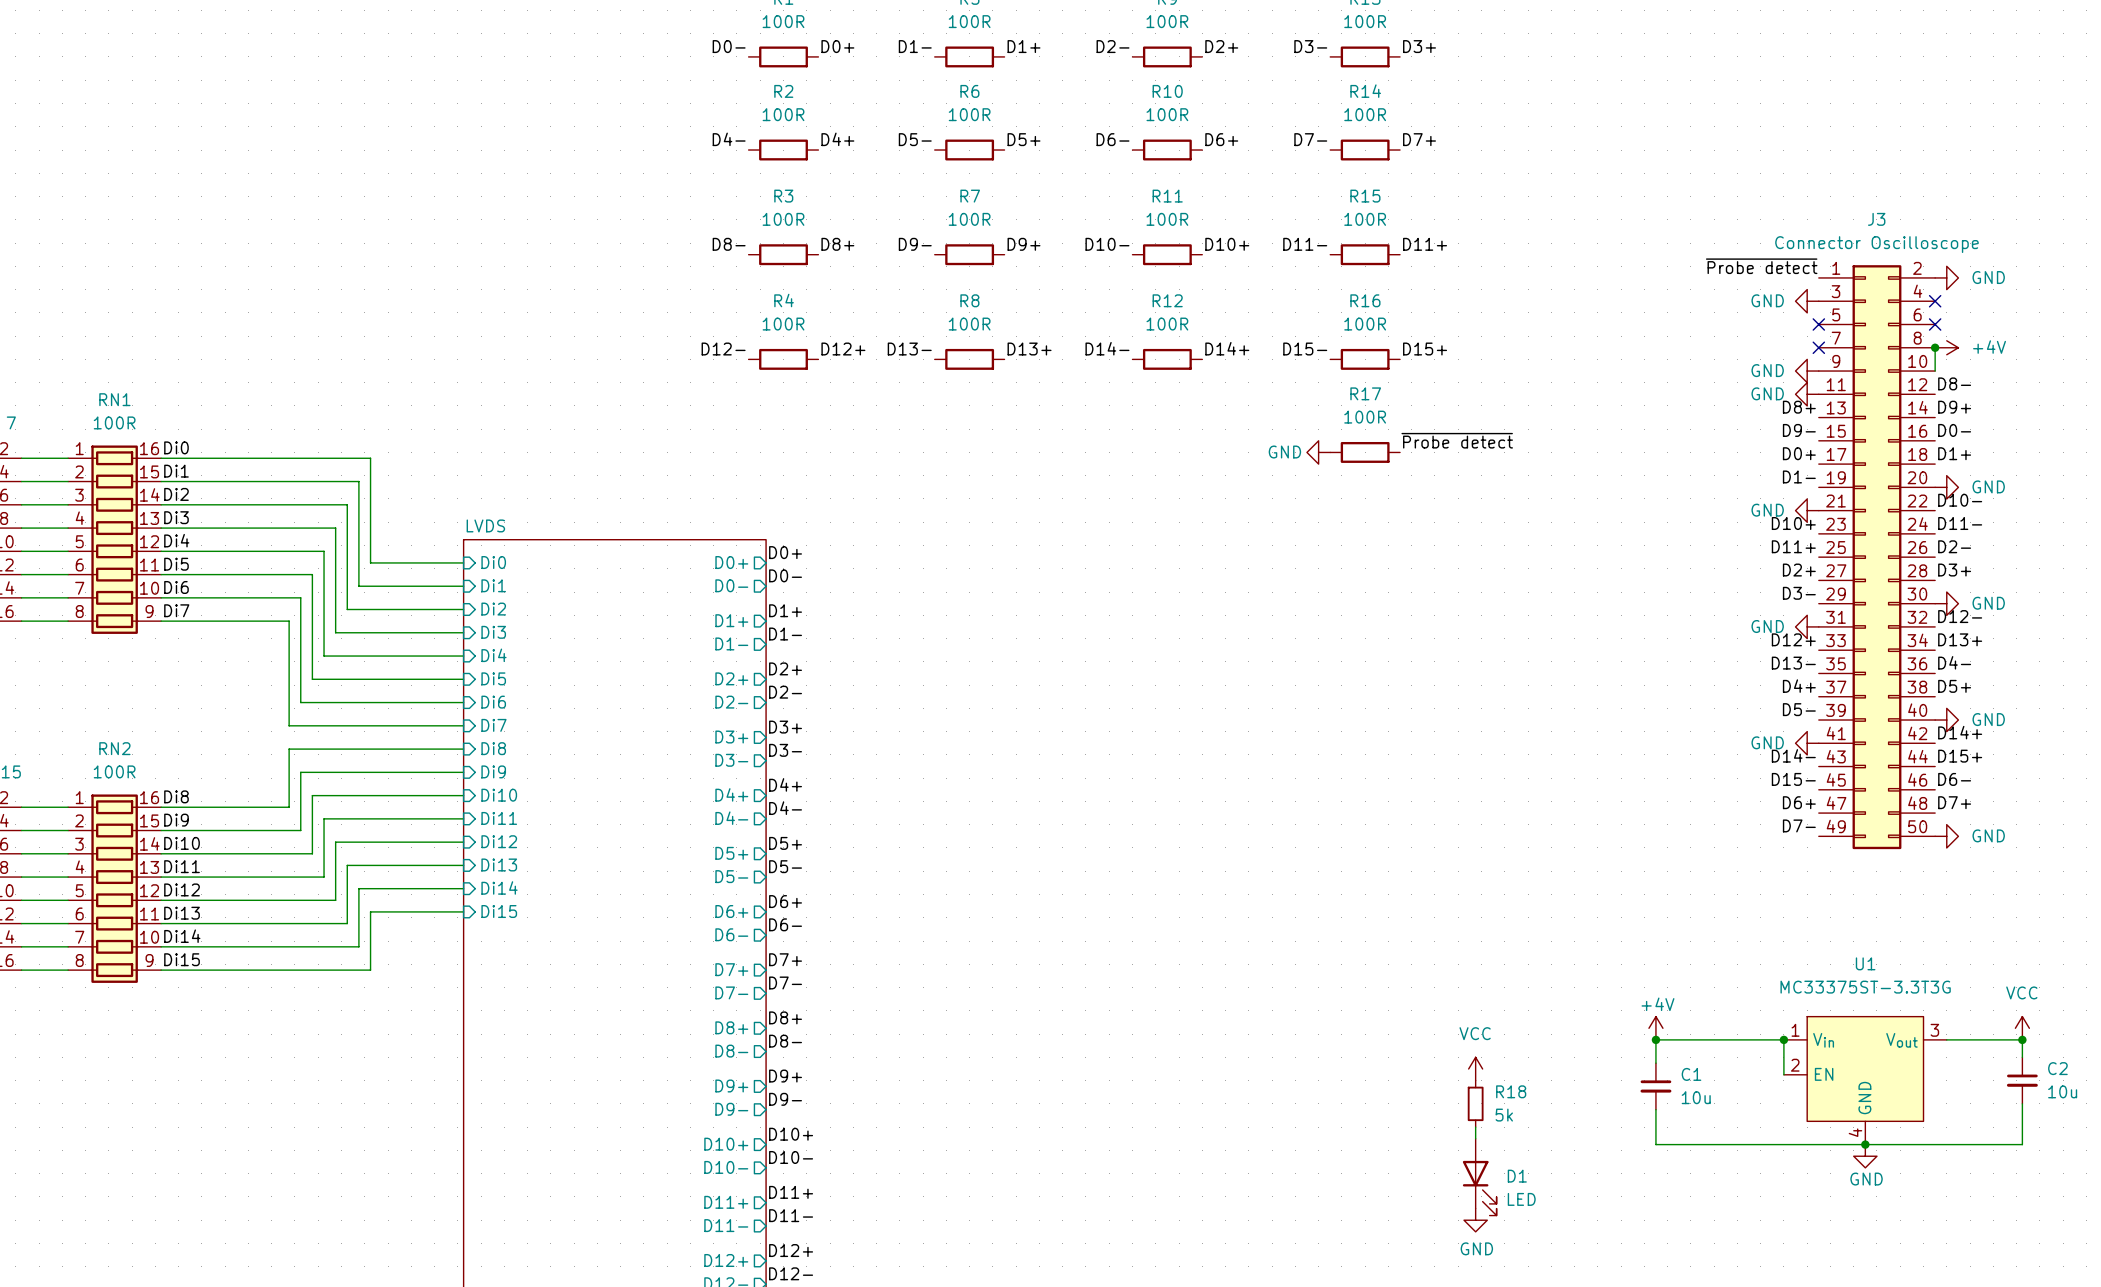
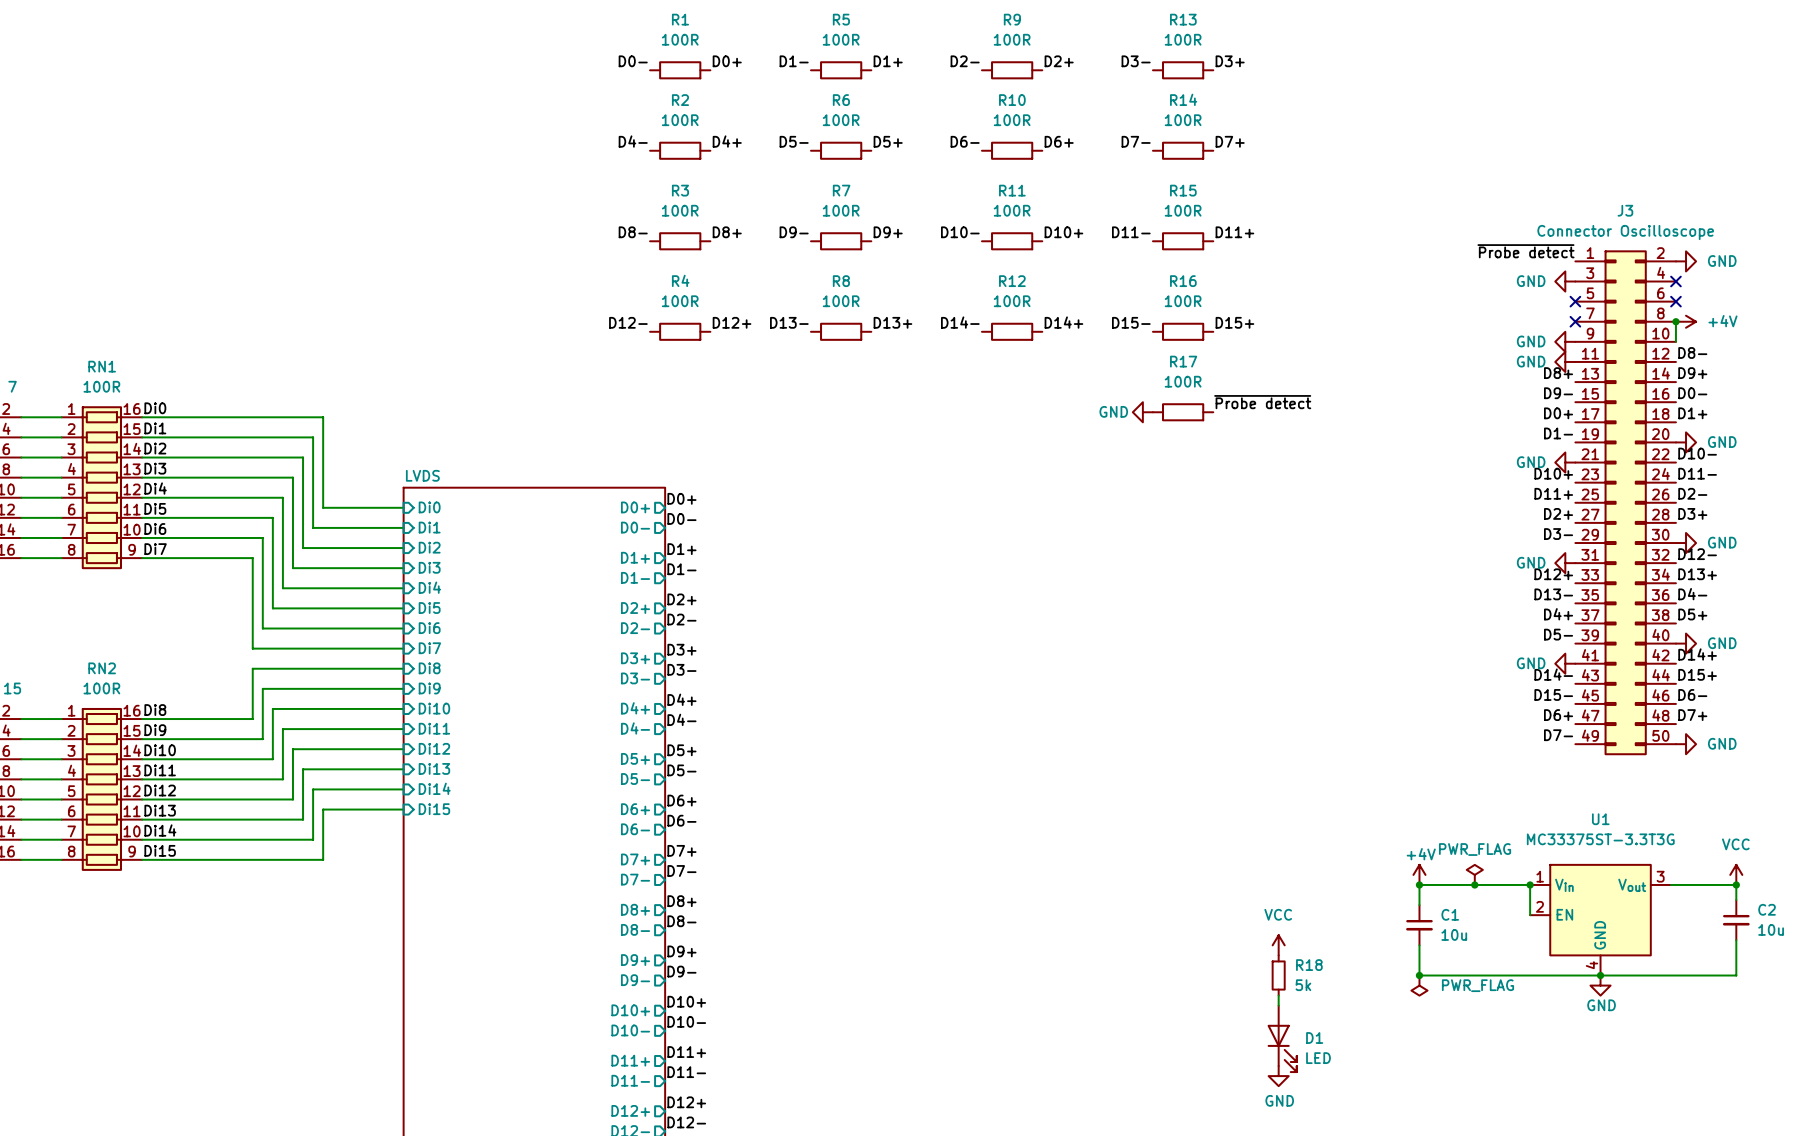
power symbol: none -> PWR_FLAG (1474, 874)
junction: none -> (1419, 884)
junction: none -> (1474, 884)
power symbol position: +4V (1655, 1028) -> +4V (1419, 874)
power symbol position: VCC (2022, 1028) -> VCC (1736, 874)
junction: (1655, 1039) -> none
junction position: (1783, 1039) -> (1530, 884)
wire: (1946, 1039) (2022, 1039) (2022, 1057) -> (1670, 884) (1736, 884) (1736, 900)
junction position: (2022, 1039) -> (1736, 884)
wire: (1655, 1063) (1655, 1039) (1783, 1039) (1783, 1074) -> (1419, 905) (1419, 884) (1530, 884) (1530, 915)
U1 position: (1865, 1080) -> (1600, 919)
C2 position: (2022, 1080) -> (1736, 920)
C1 position: (1655, 1086) -> (1419, 925)
junction: none -> (1419, 975)
wire: (2022, 1103) (2022, 1144) (1655, 1144) (1655, 1109) -> (1736, 940) (1736, 975) (1419, 975) (1419, 945)
power symbol: none -> PWR_FLAG (1419, 985)
junction position: (1865, 1144) -> (1600, 975)
power symbol position: GND (1865, 1156) -> GND (1600, 985)

